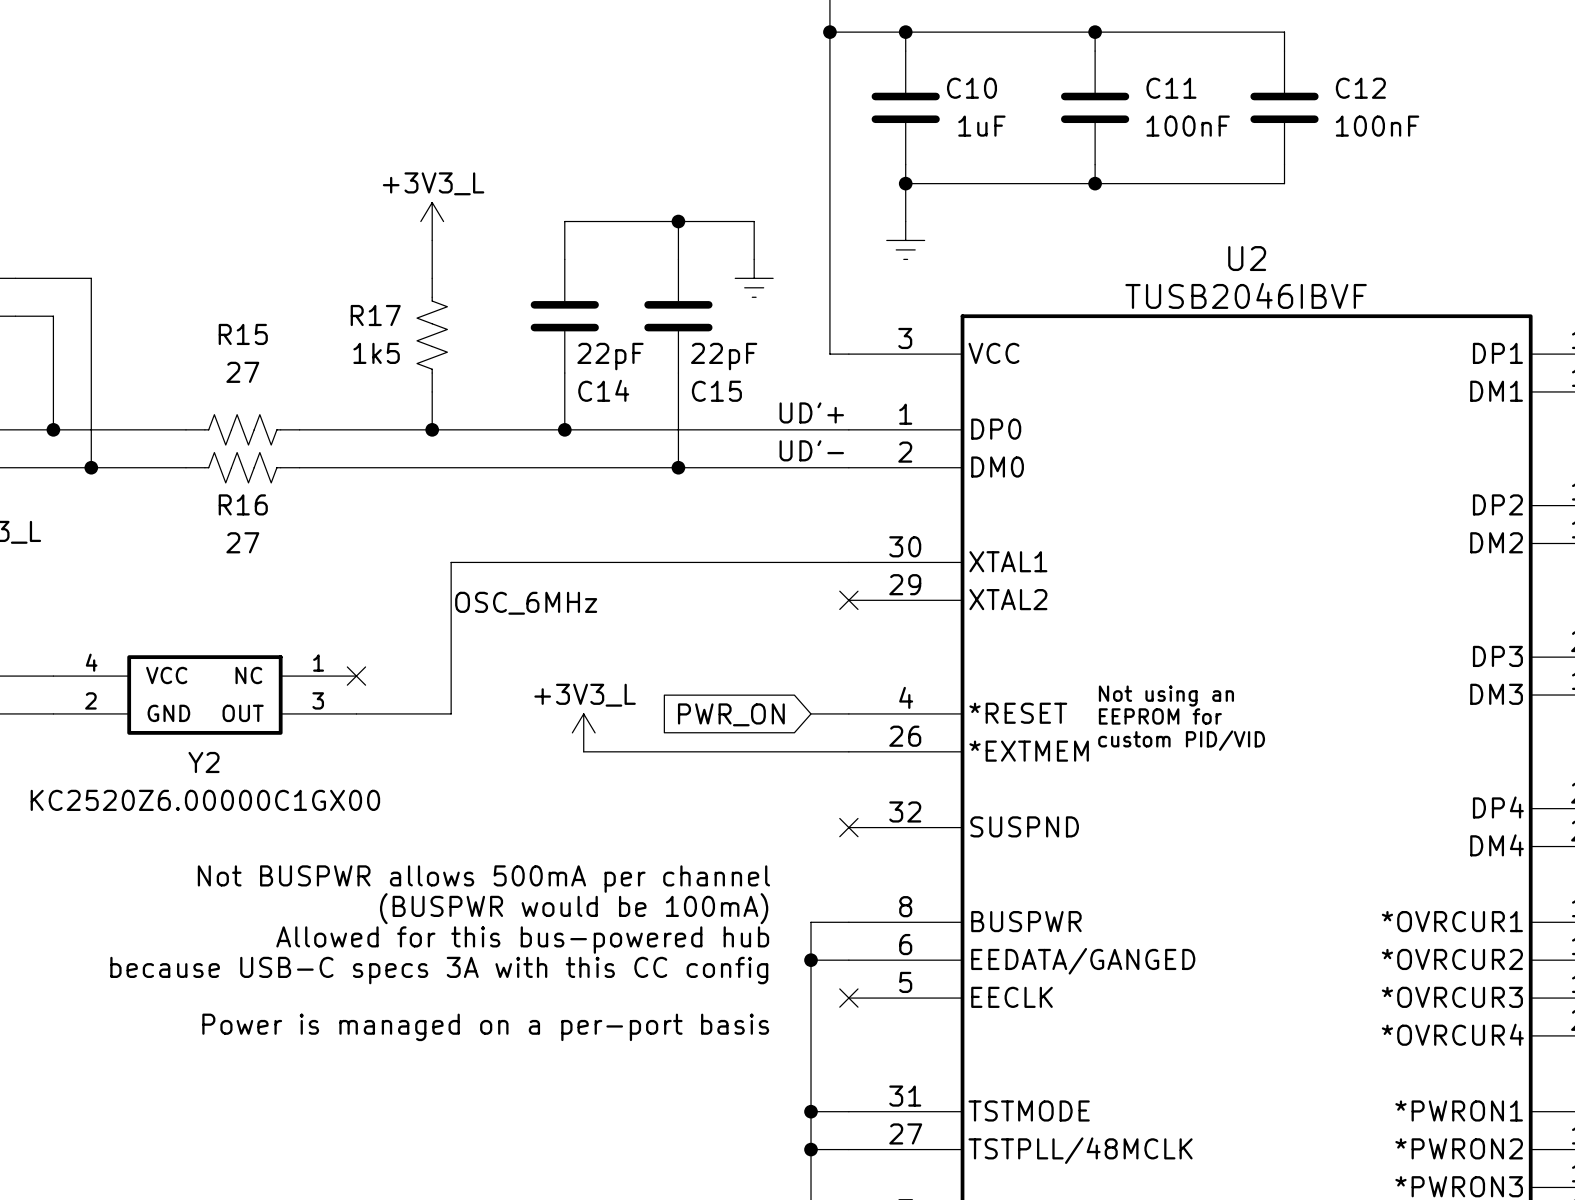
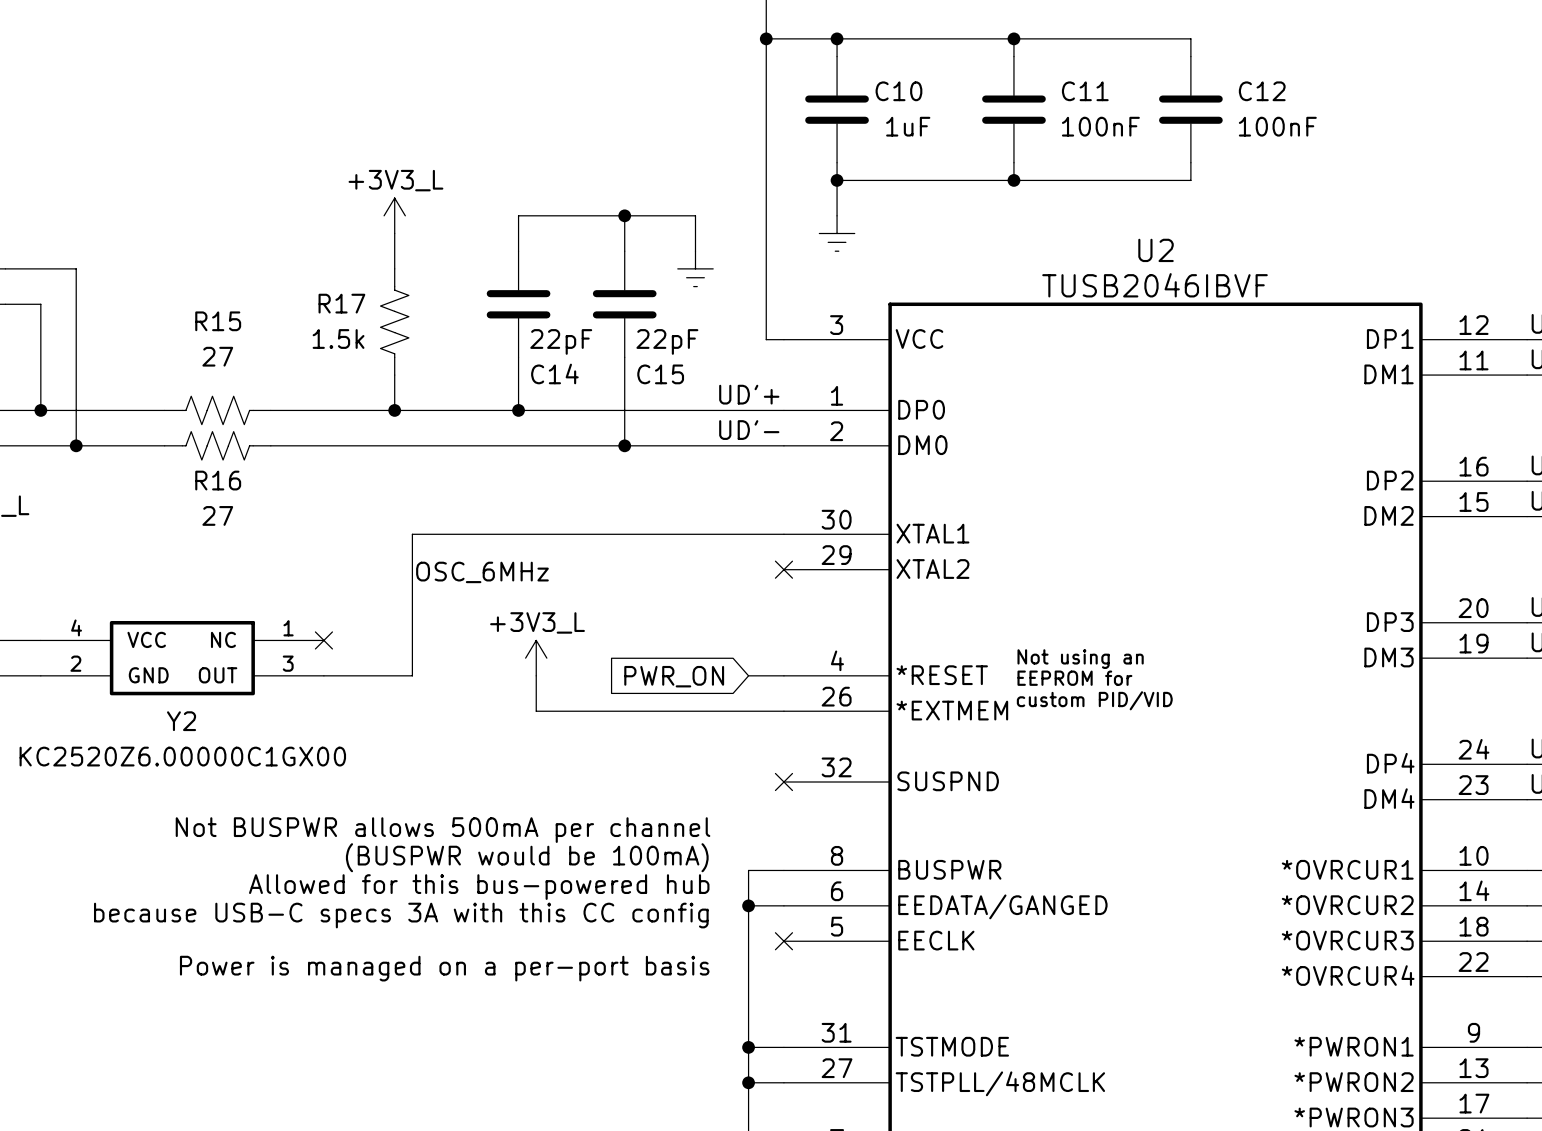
R17 value: 1k5 (376, 353) -> 1.5k (338, 339)
power symbol position: +3V3_L (583, 732) -> +3V3_L (536, 658)

